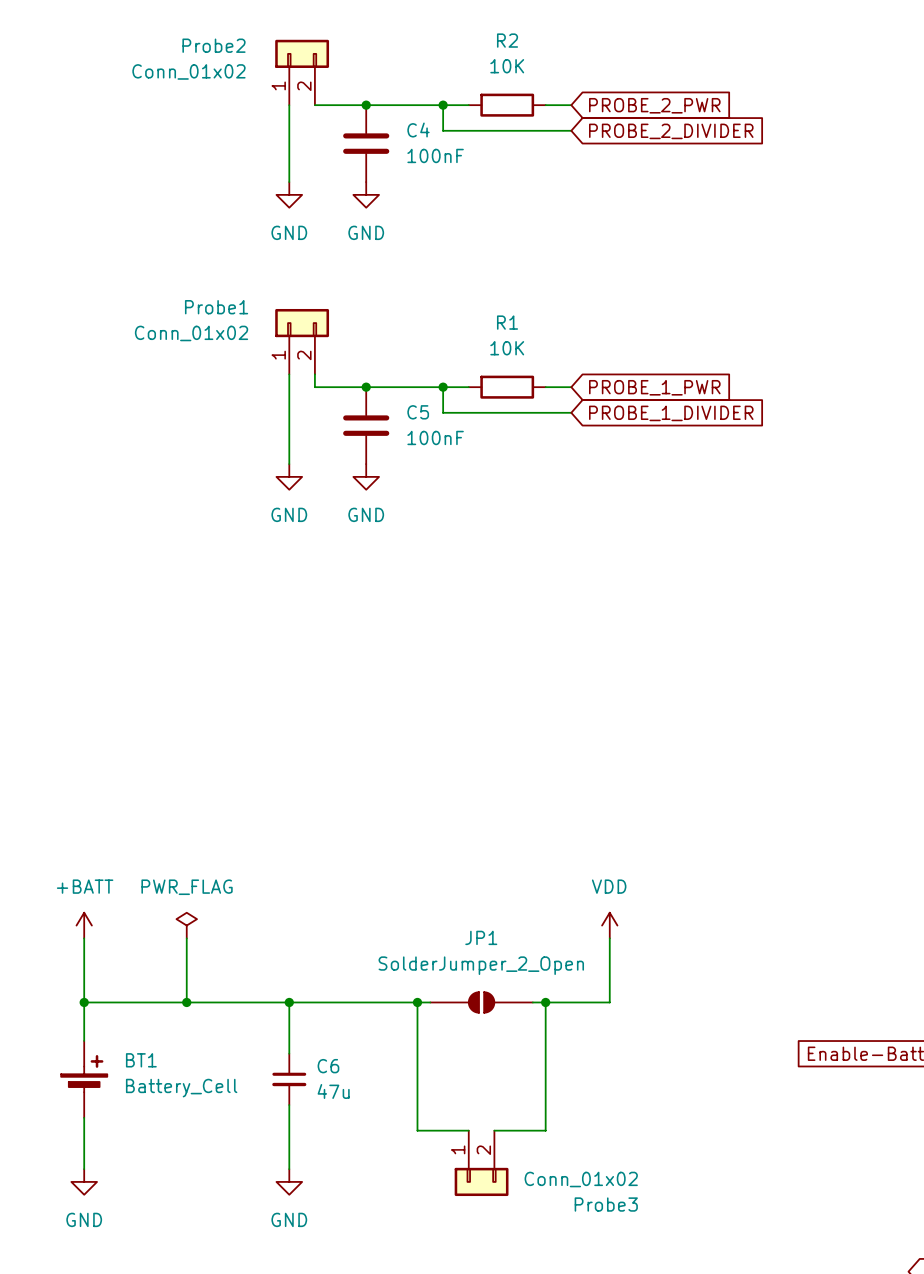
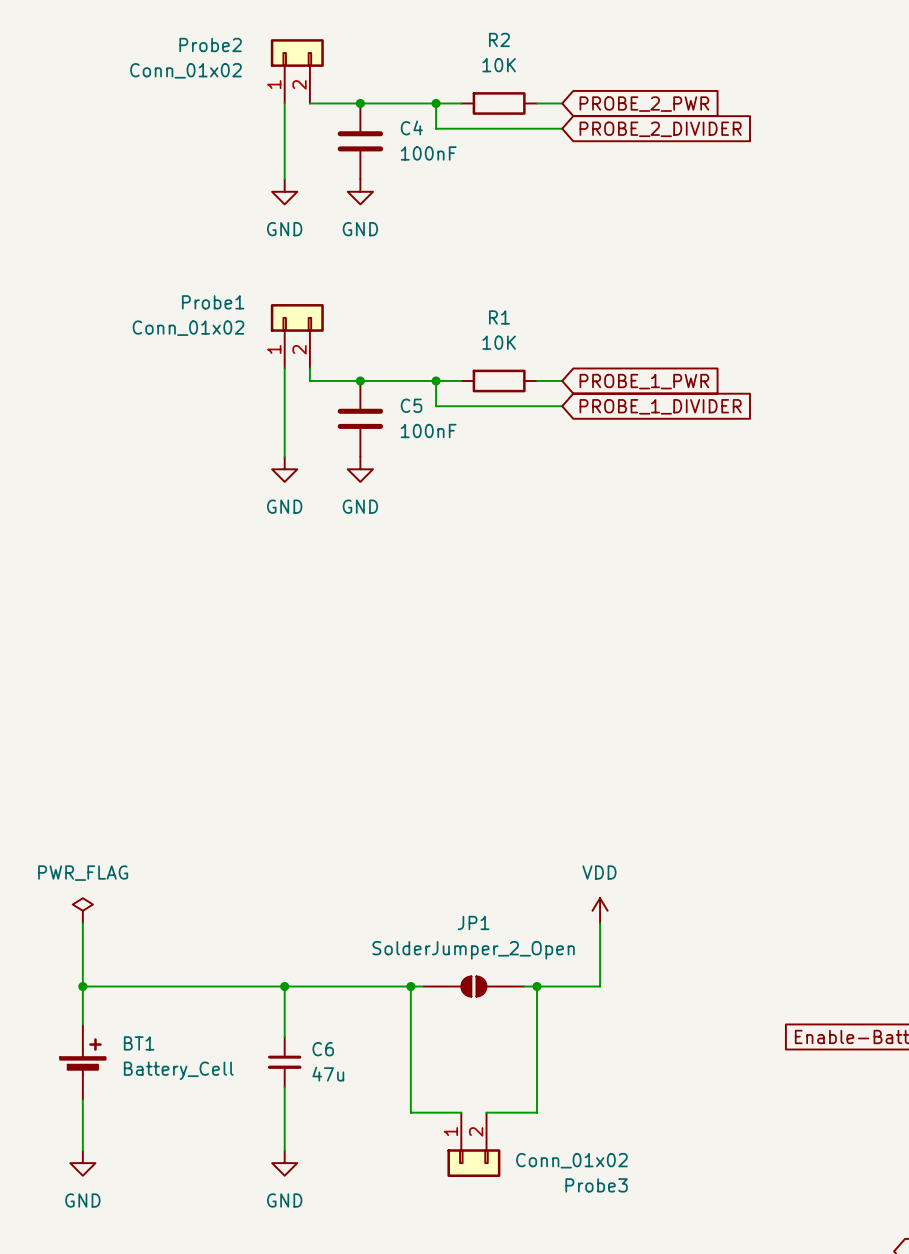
power symbol: +BATT (84, 925) -> PWR_FLAG (82, 910)
power symbol: PWR_FLAG (186, 925) -> none
wire: (186, 938) (186, 1002) -> none
junction: (186, 1002) -> none

